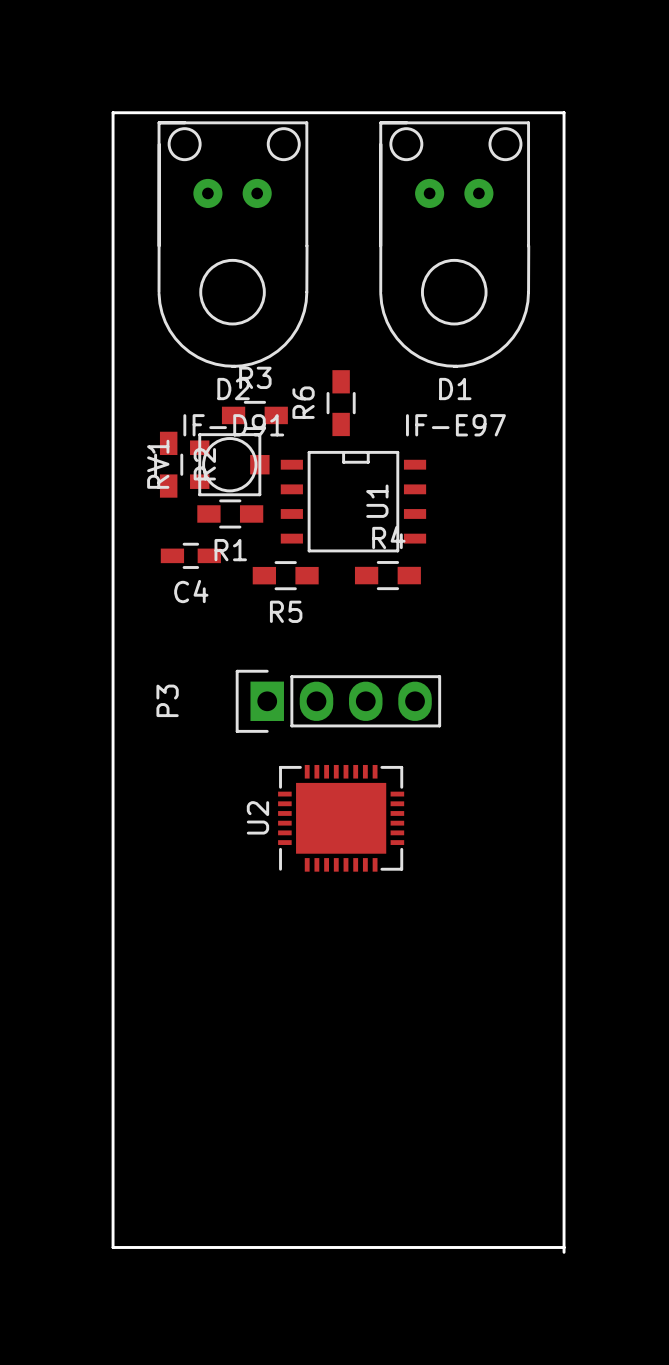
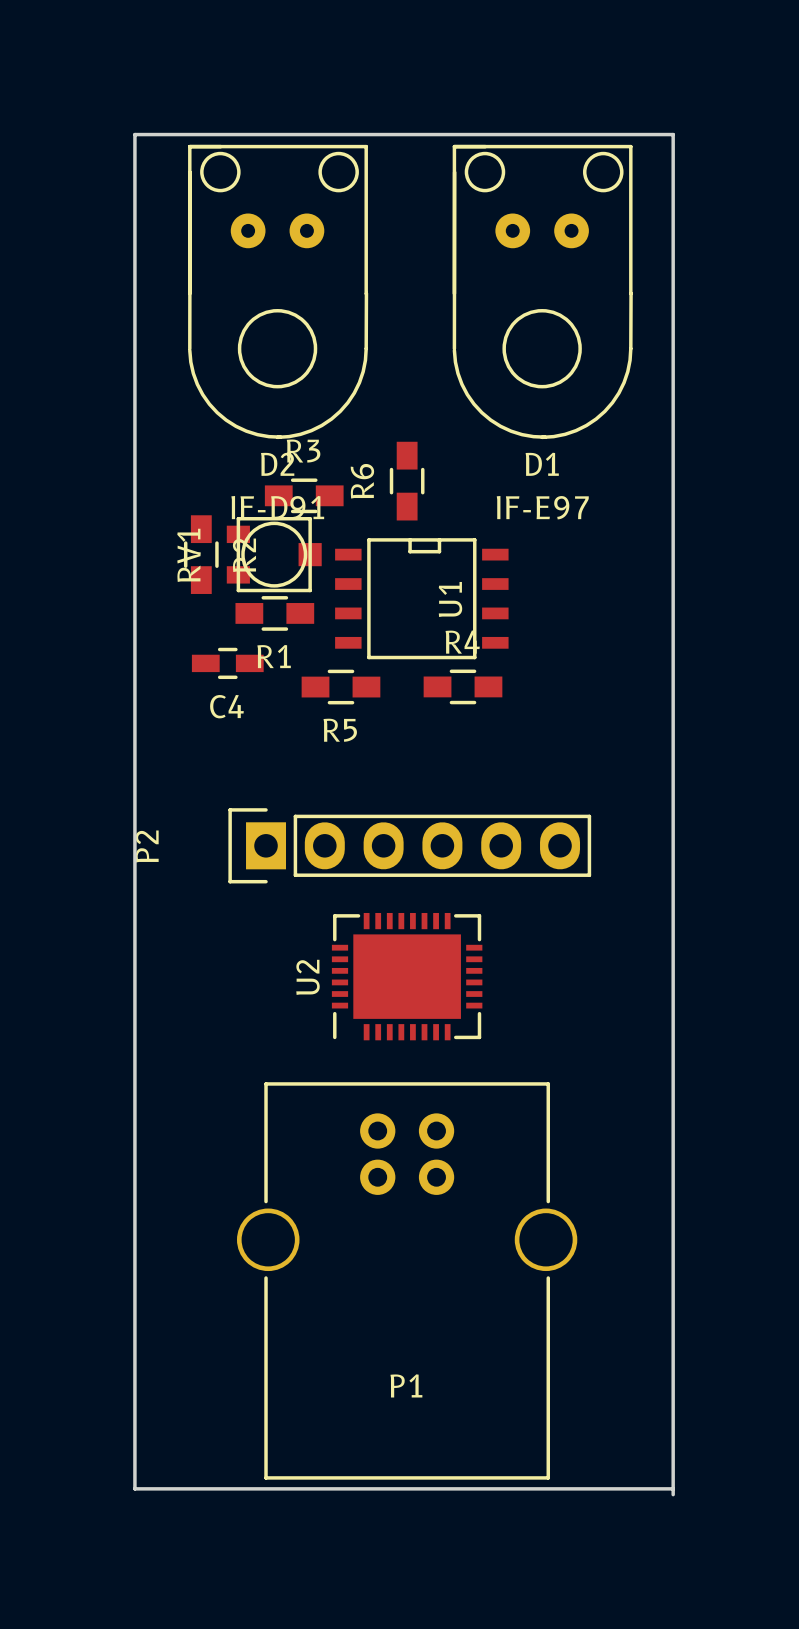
P3: (338, 701) -> none
P2: none -> (409, 845)
P1: none -> (407, 1280)

